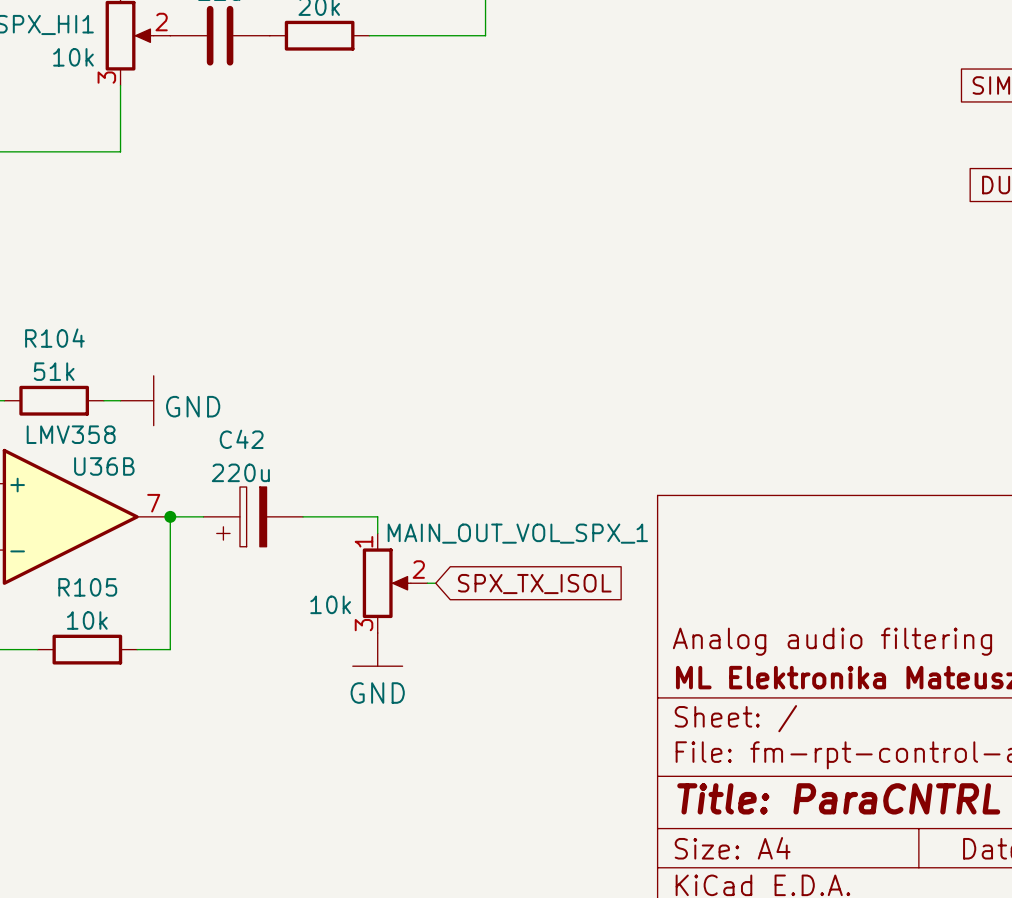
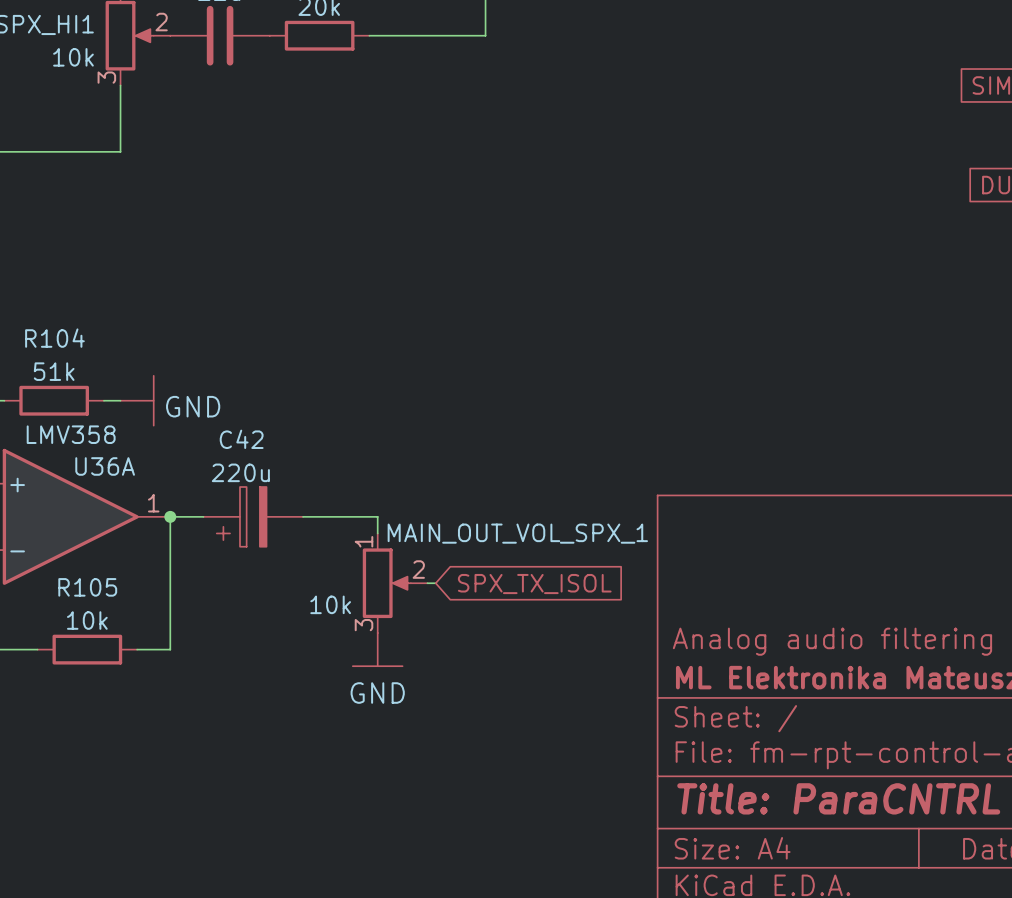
U36B name: U36B (104, 466) -> U36A (105, 466)
U36B pin number: 7 (153, 503) -> 1 (153, 503)

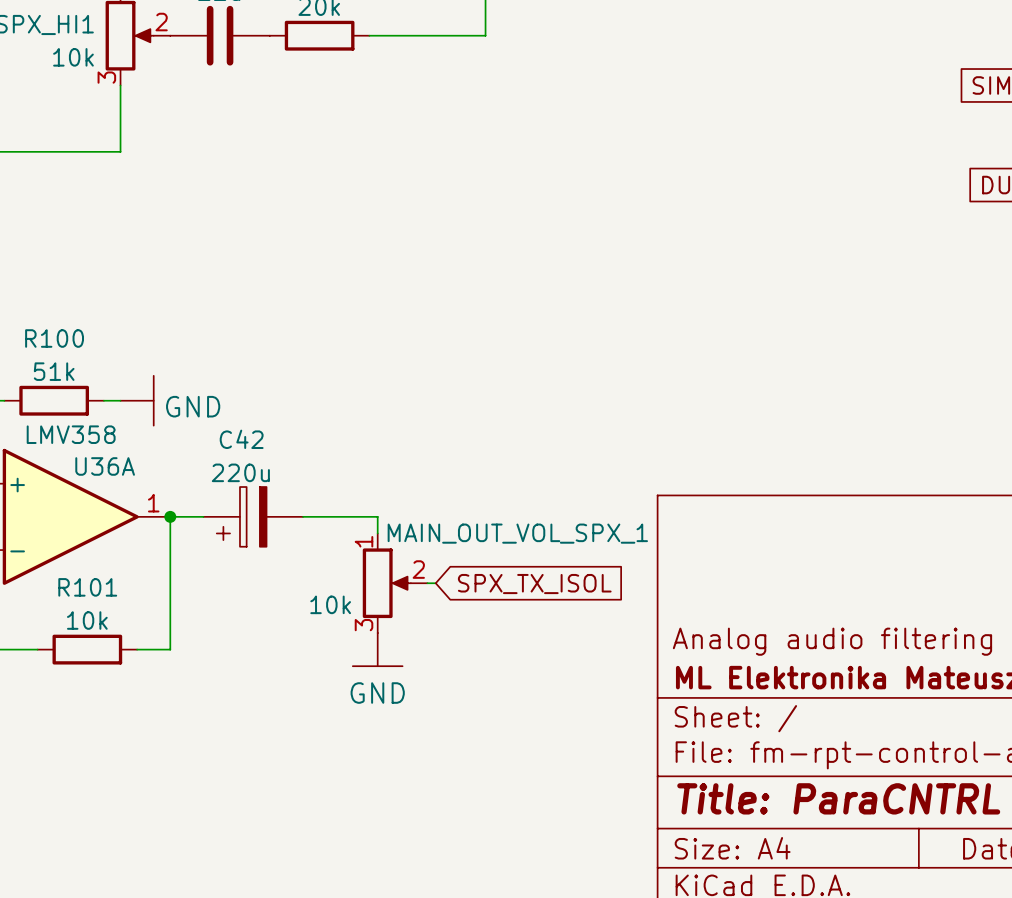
R104 name: R104 (54, 338) -> R100 (54, 338)
R105 name: R105 (87, 587) -> R101 (87, 587)

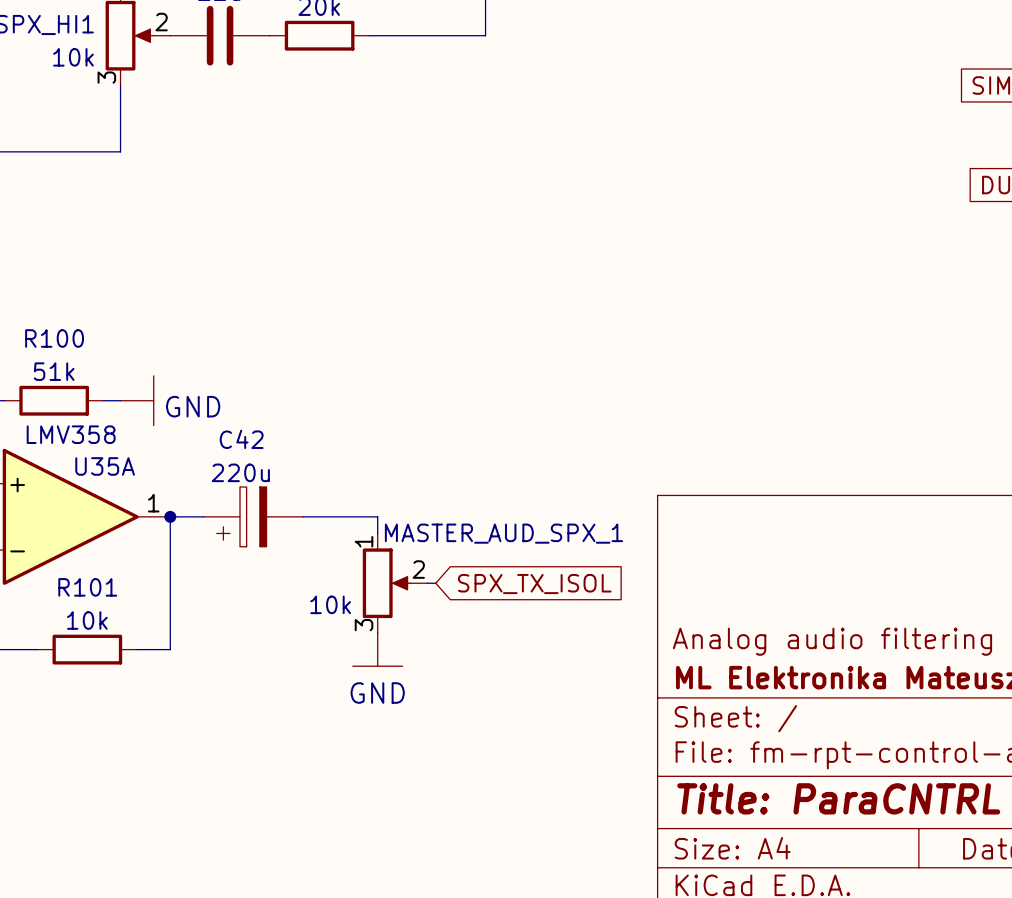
U36A name: U36A (105, 466) -> U35A (105, 466)
MAIN_OUT_VOL_SPX_1 name: MAIN_OUT_VOL_SPX_1 (517, 533) -> MASTER_AUD_SPX_1 (503, 533)

